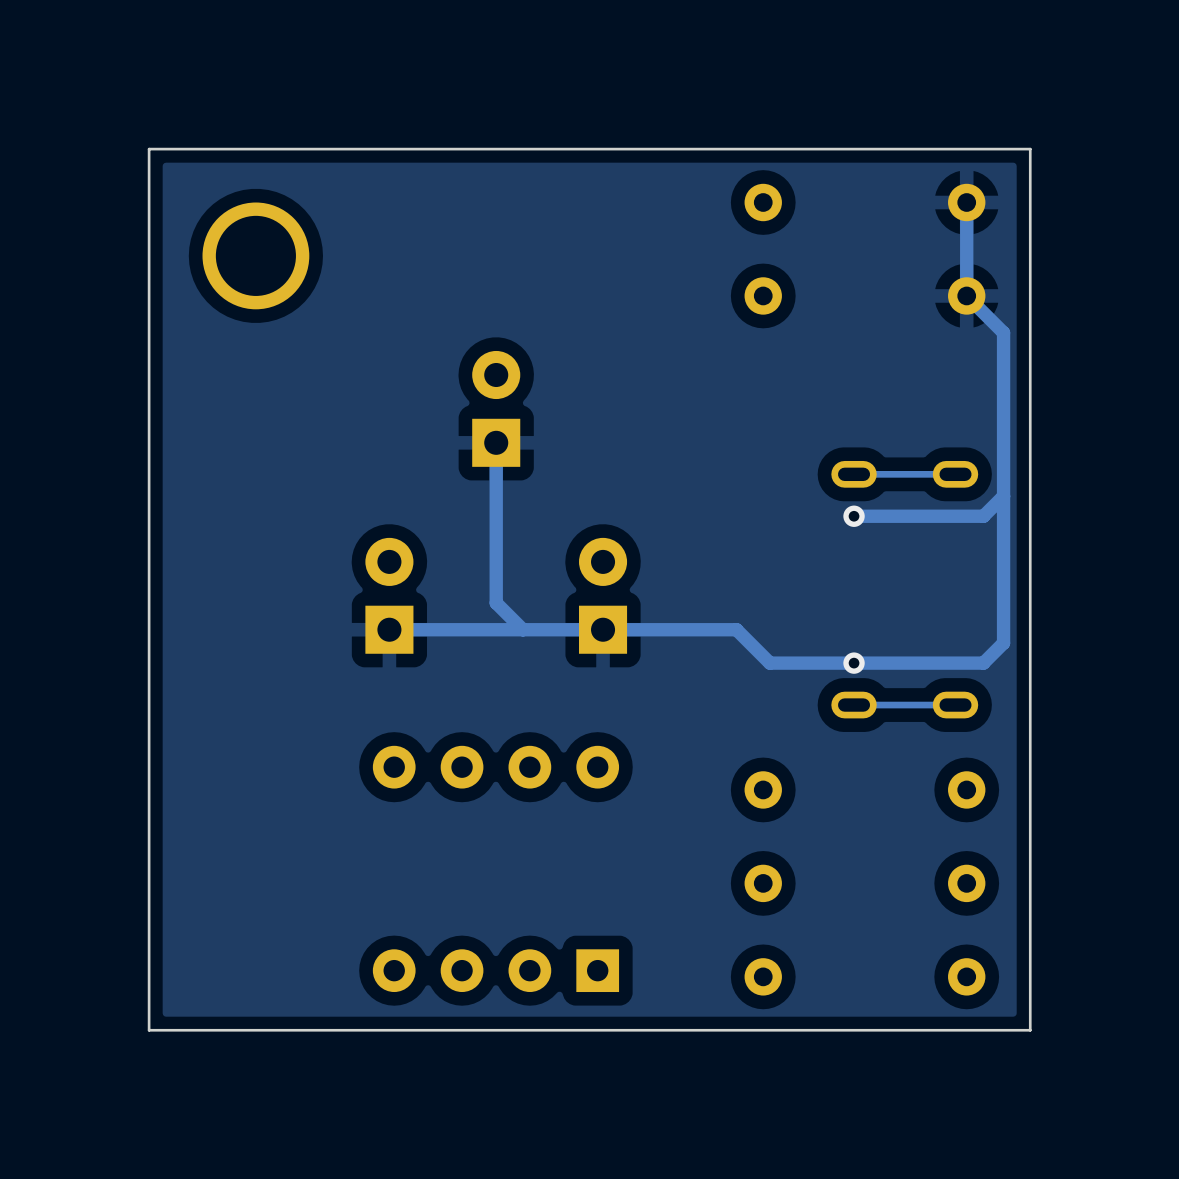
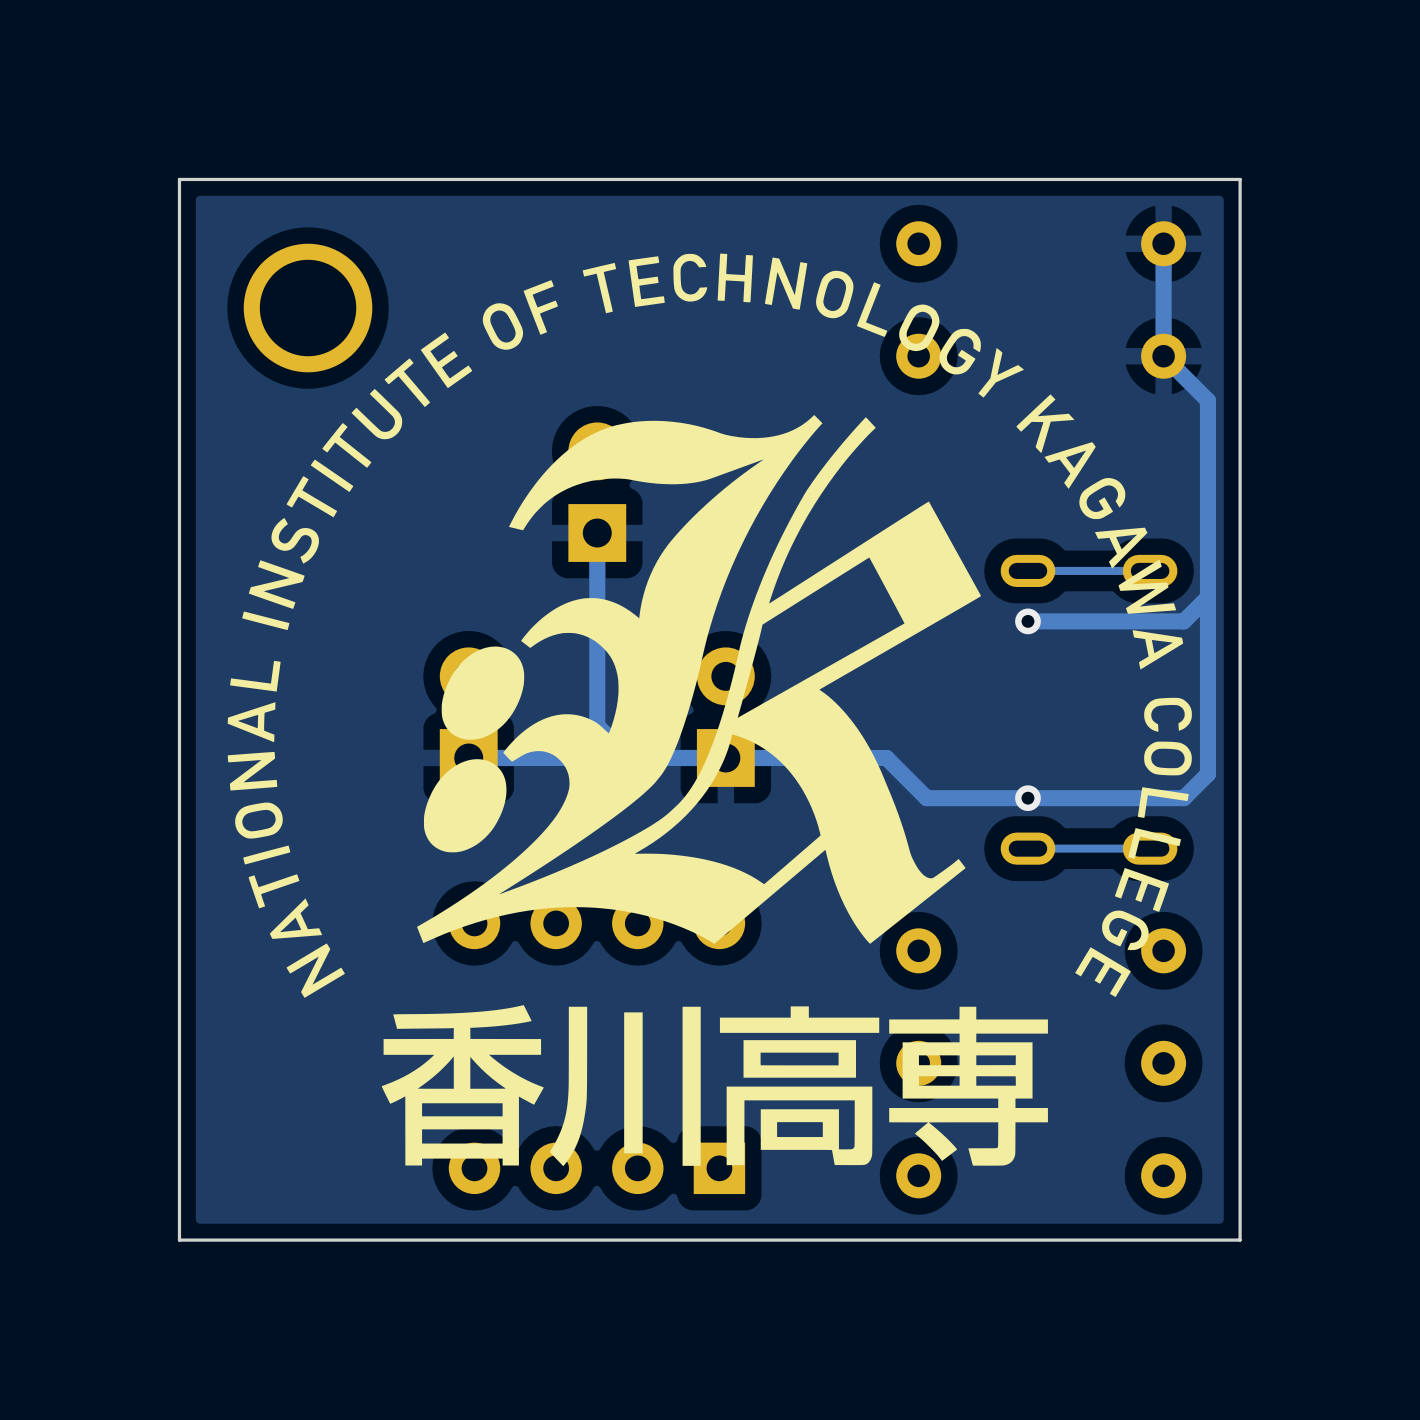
drawing: none -> [227, 253, 1192, 1167]

